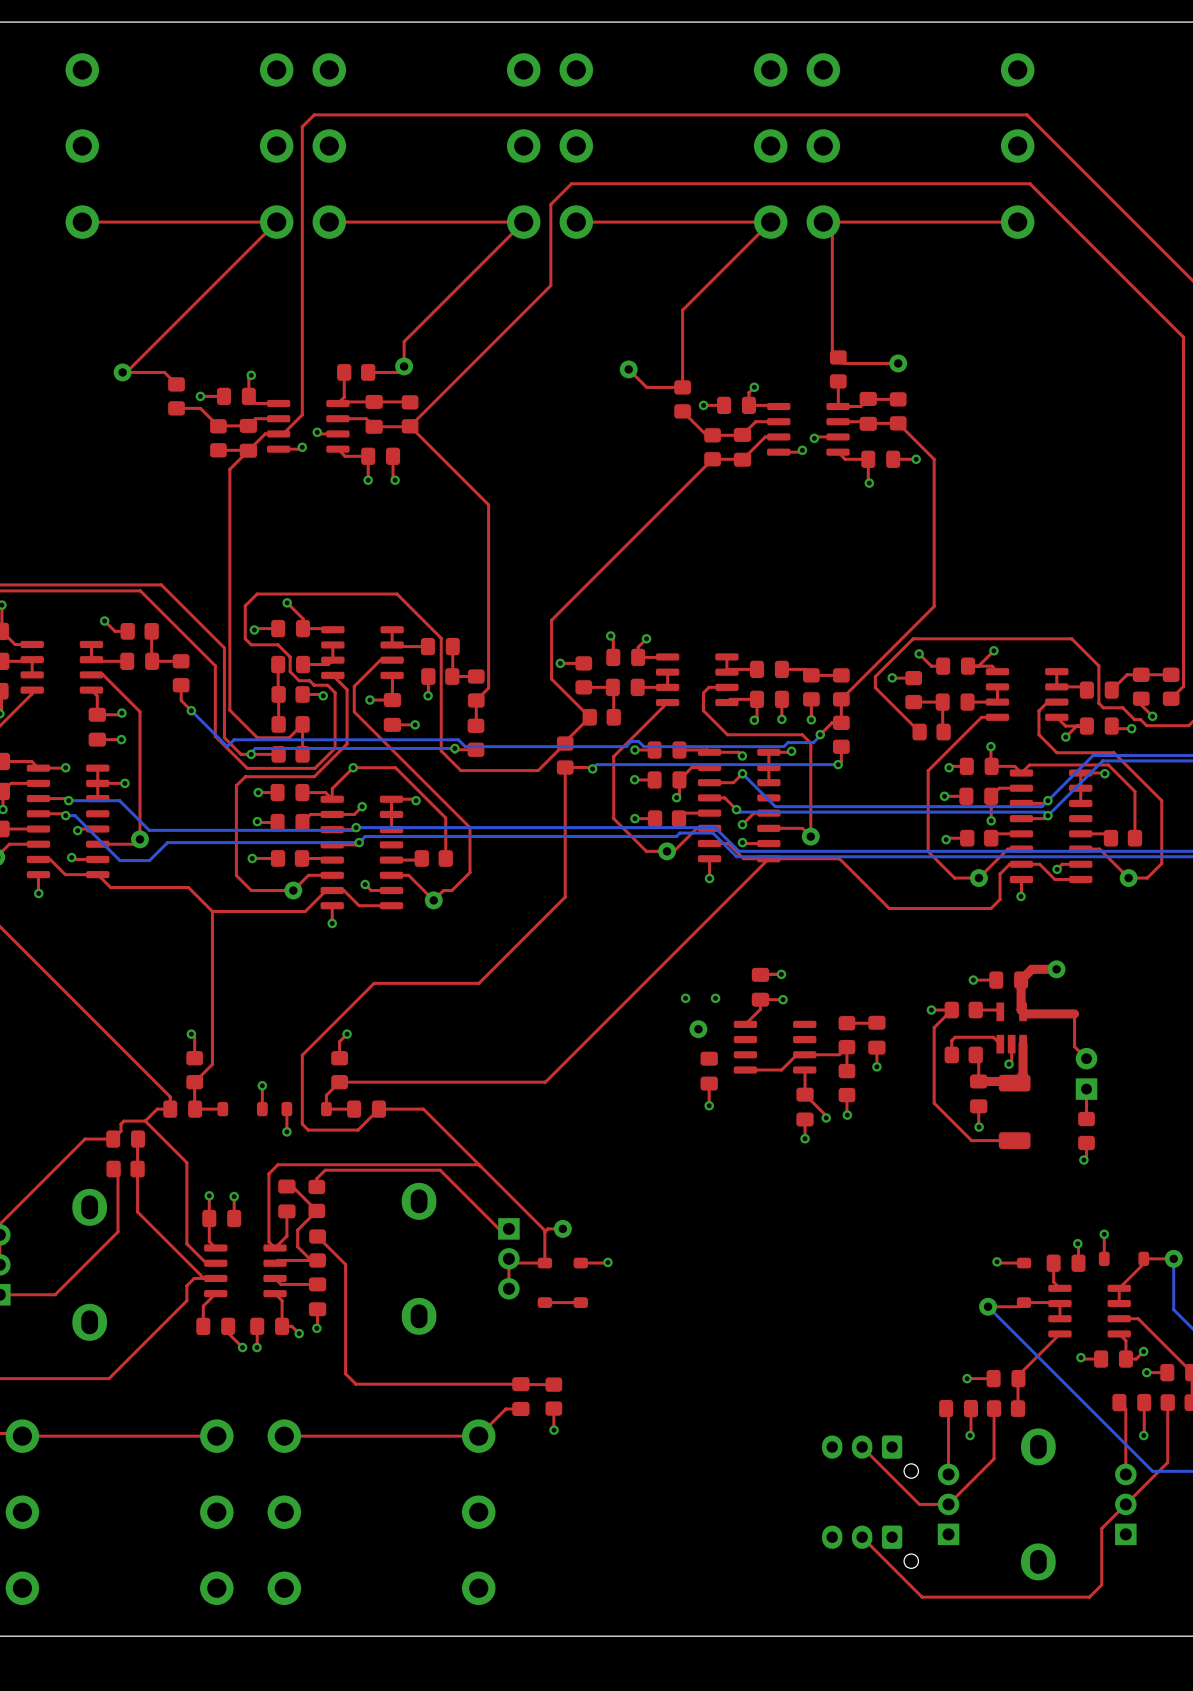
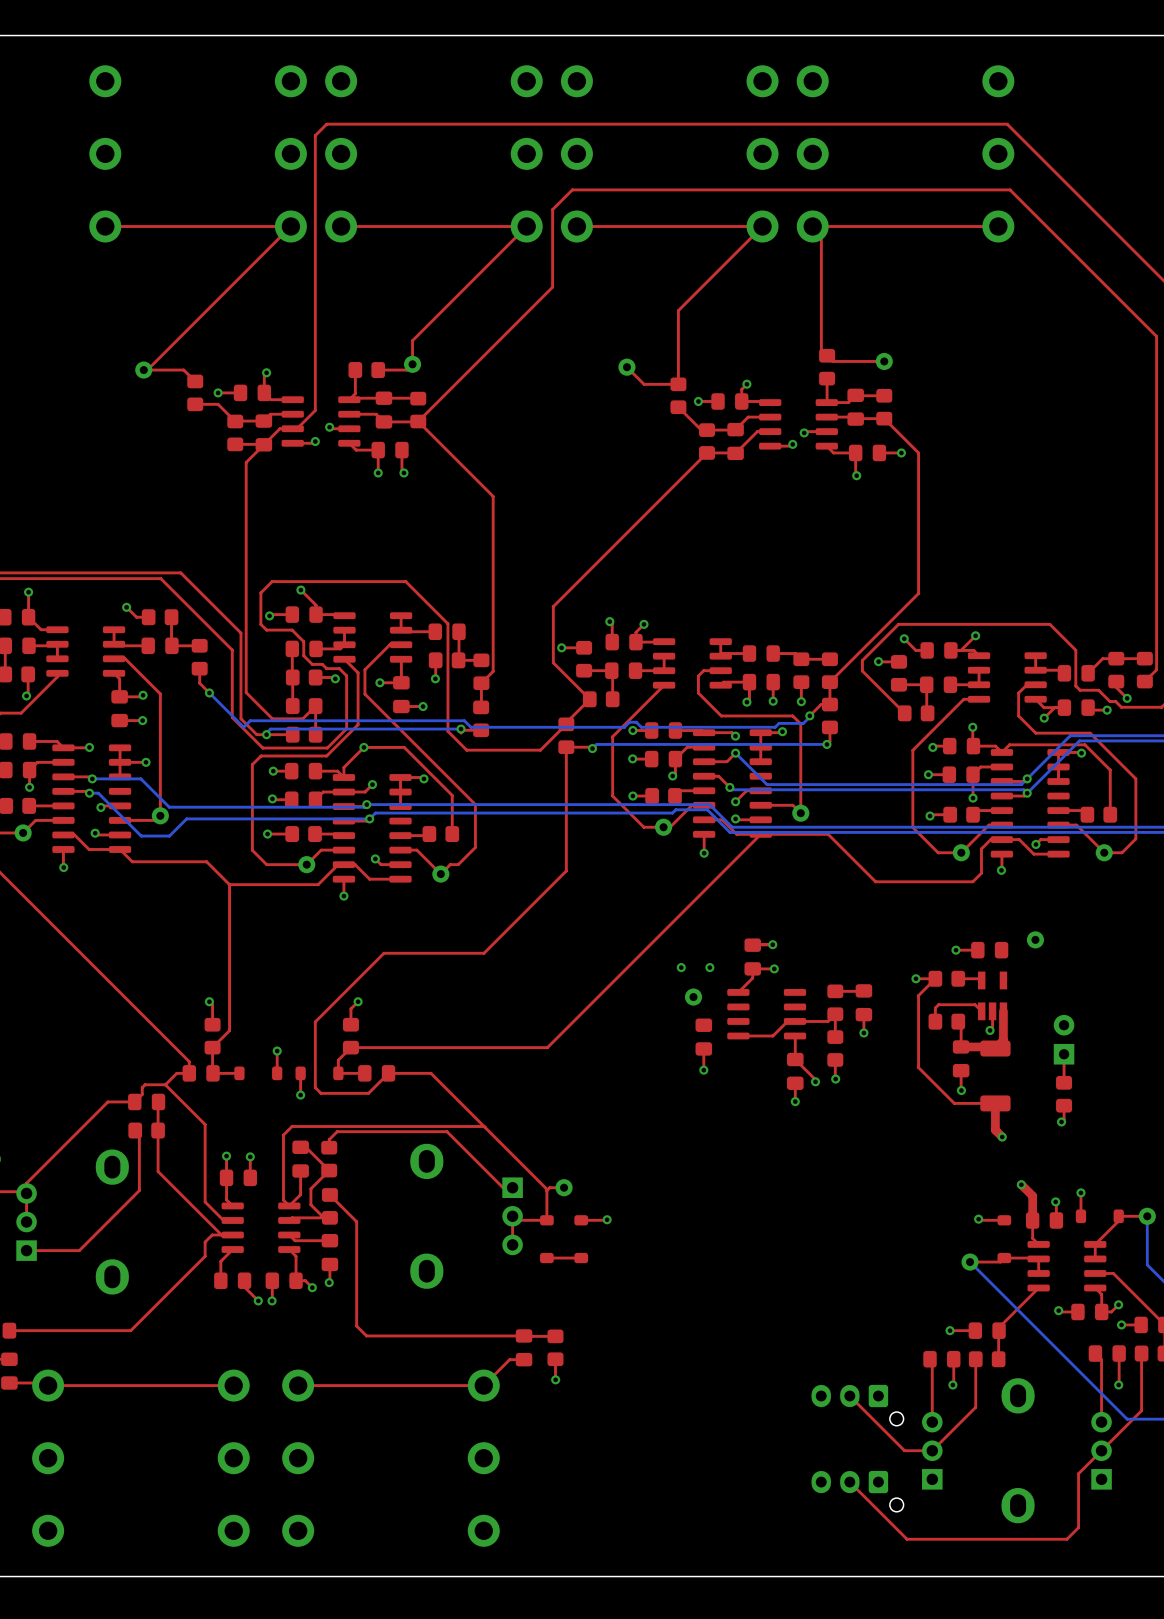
top track: (1056, 969) (1031, 969) (1021, 980) (1021, 1009) (1025, 1013) (1074, 1013) (1074, 1046) (1086, 1058) -> none
top track: none -> (995, 1103) (995, 1130) (1002, 1136)
via: none -> (1002, 1136)
top track: none -> (1021, 1184) (1032, 1196) (1032, 1220)
via: none -> (1021, 1184)

